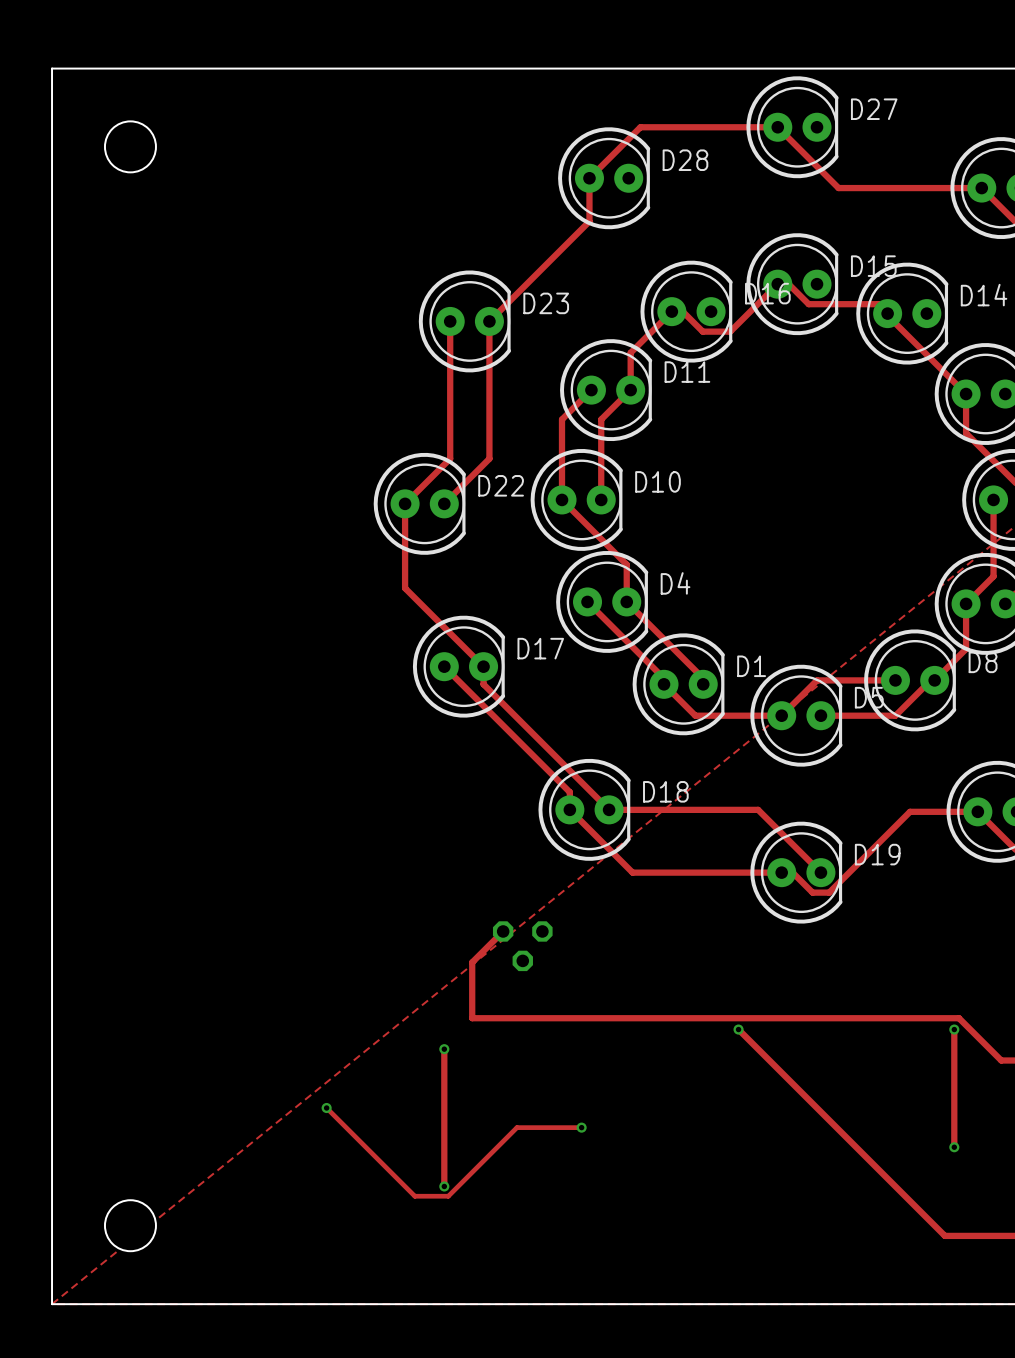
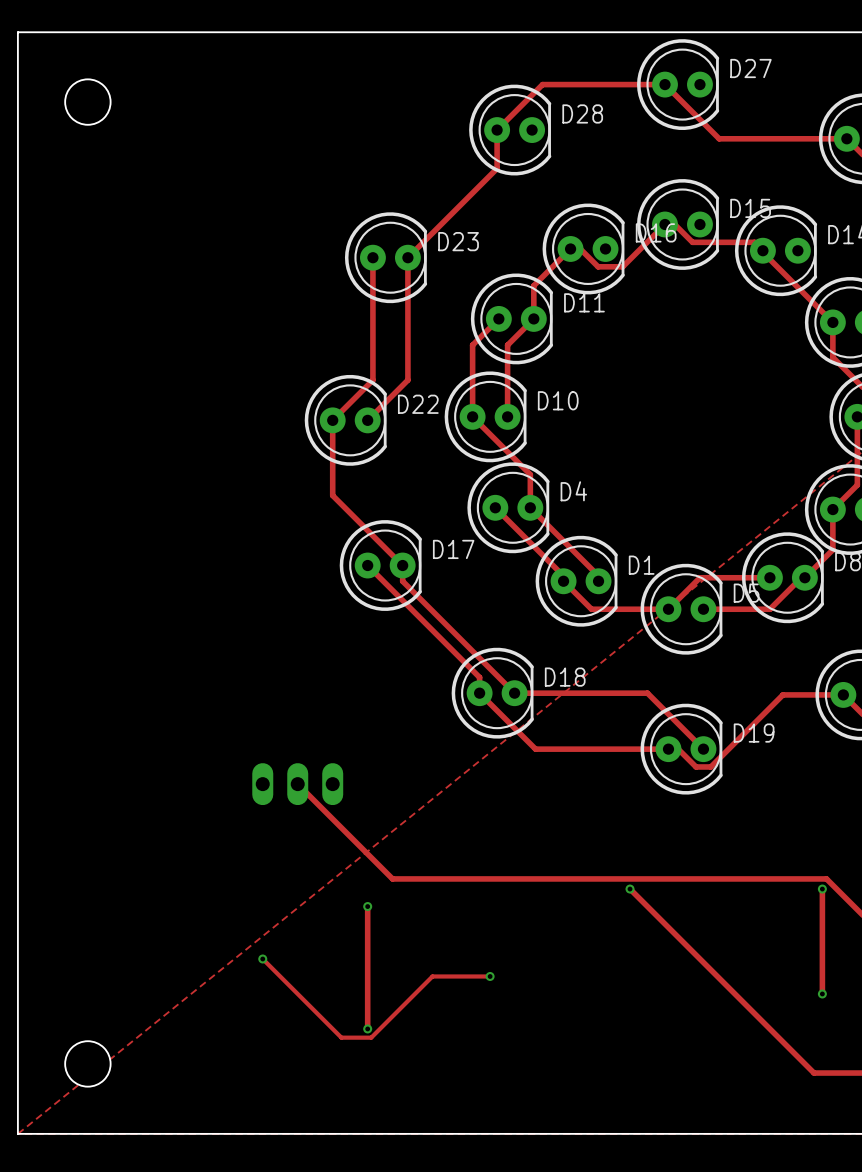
part: none -> (297, 784)
track: (503, 931) (472, 962) (472, 1018) -> (297, 784) (392, 878)
part: (522, 946) -> none

